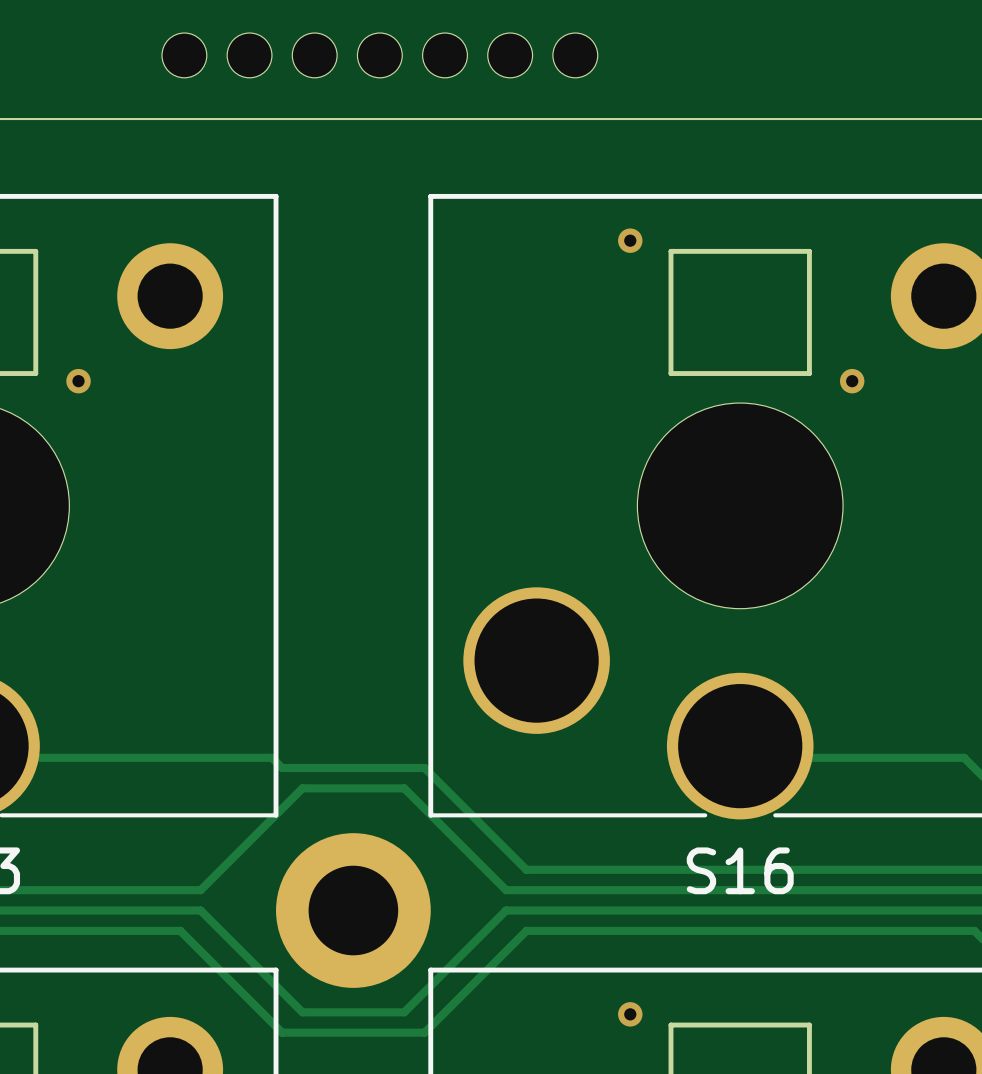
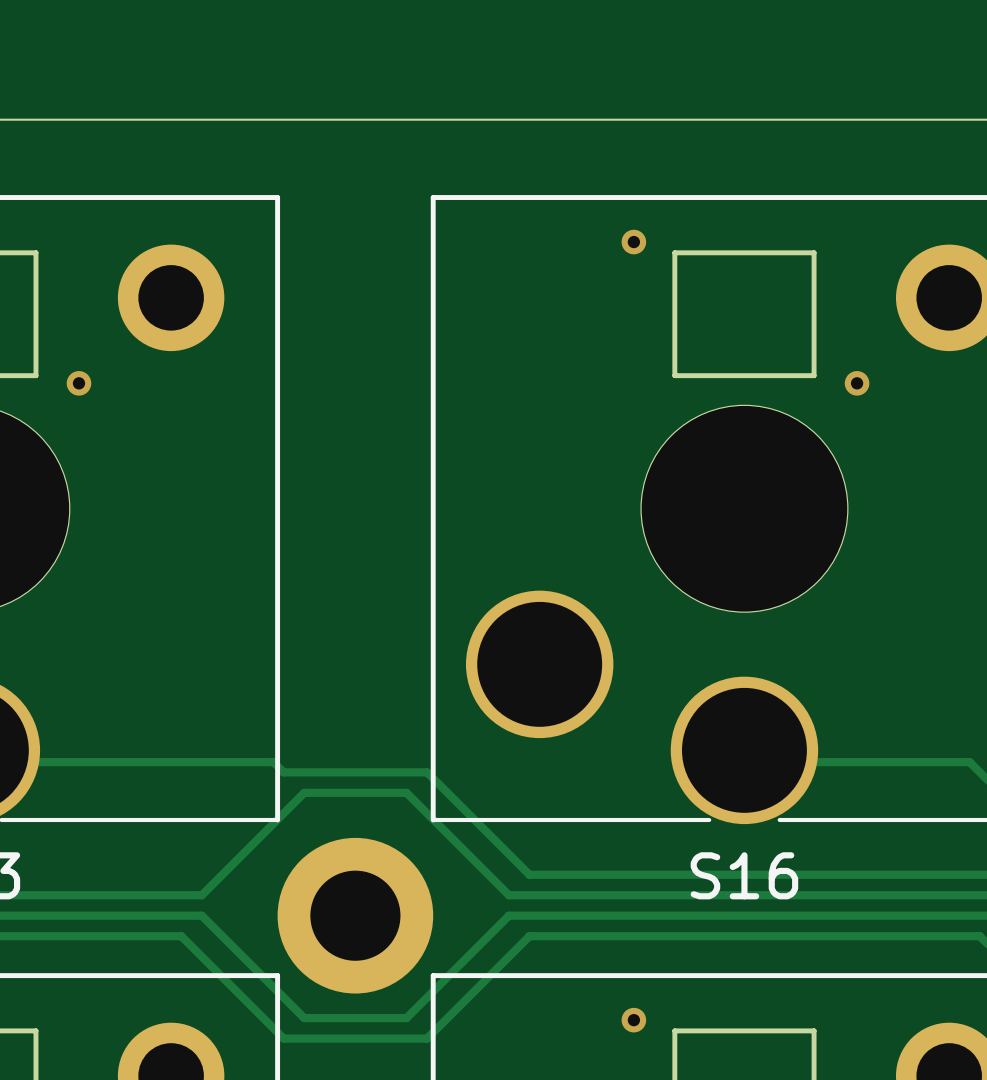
part: (379, 55) -> none

